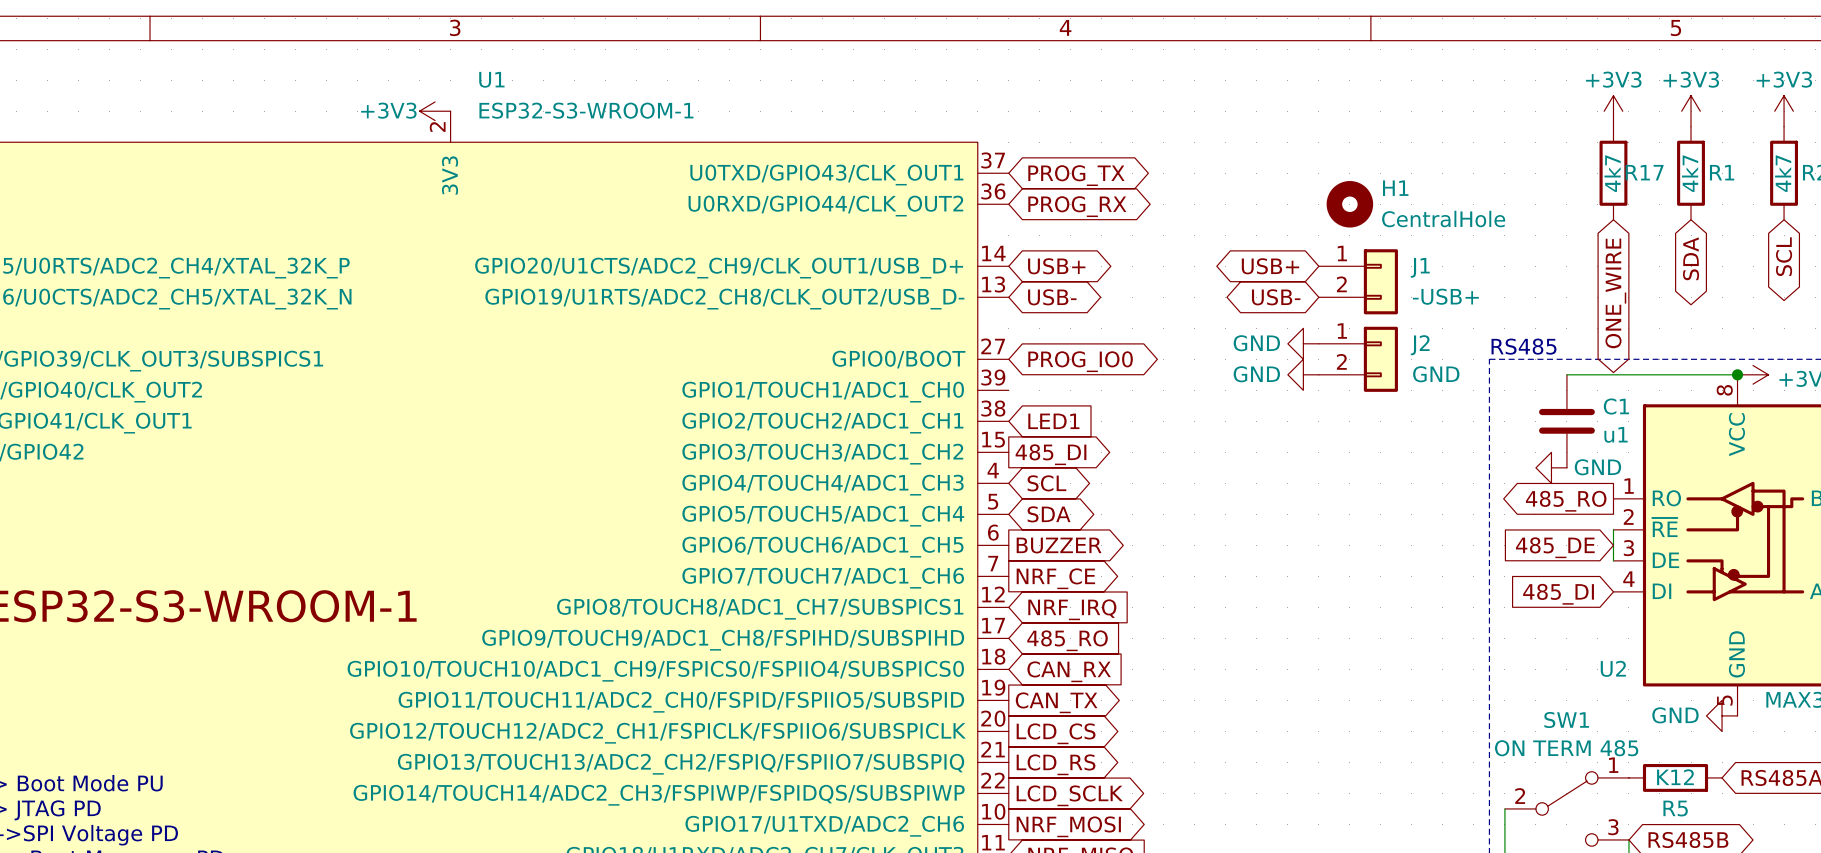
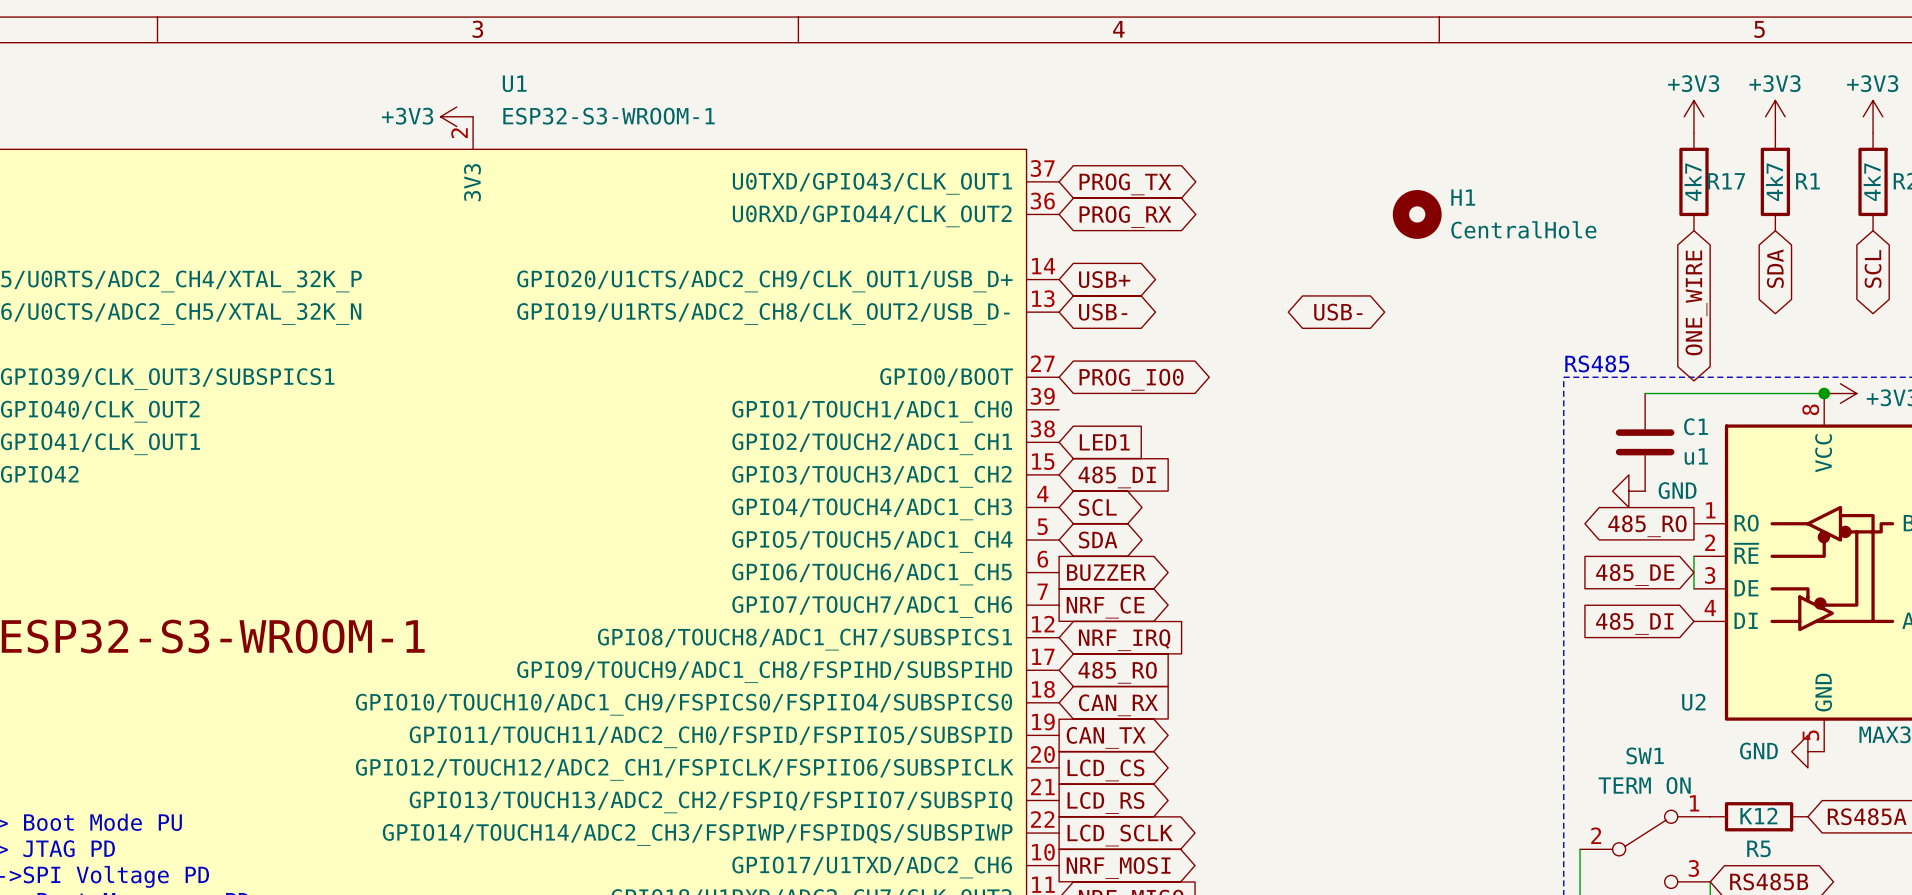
global label: USB+ (1270, 266) -> none
J1: -USB+ (1358, 281) -> none
power symbol: GND (1303, 343) -> none
J2: GND (1358, 359) -> none
power symbol: GND (1303, 374) -> none
global label shape: output (1051, 454) -> input (1117, 477)
SW1 value: ON TERM 485 (1566, 748) -> TERM ON (1644, 785)

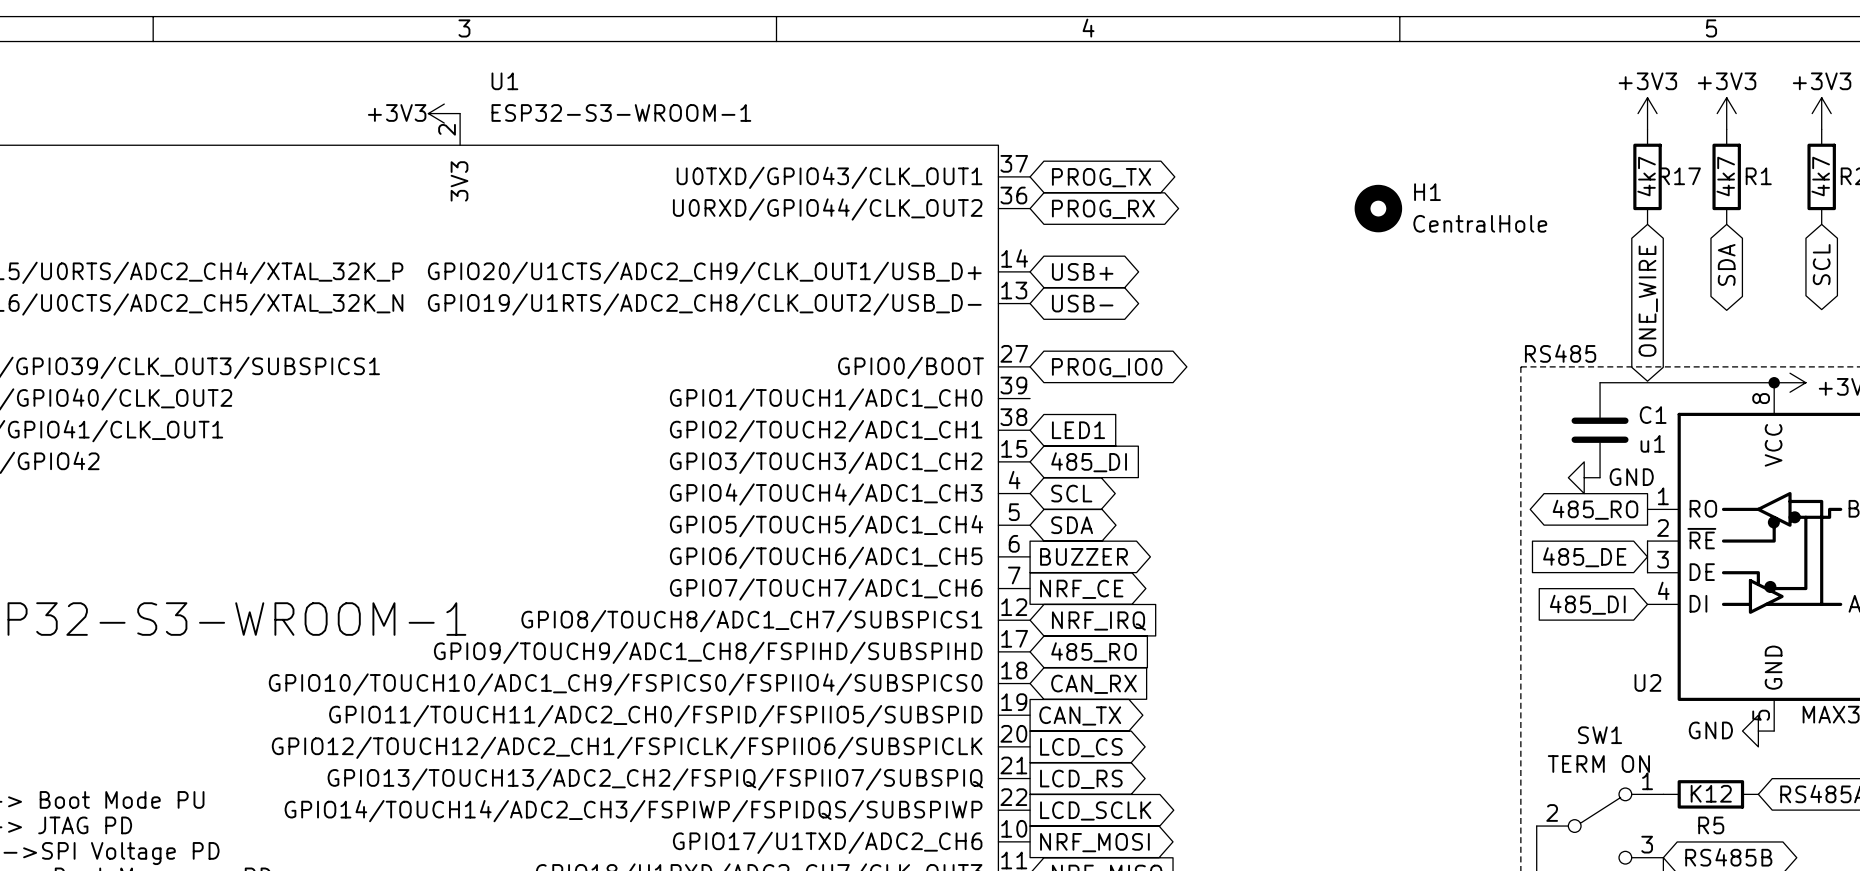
global label: USB- (1338, 312) -> none

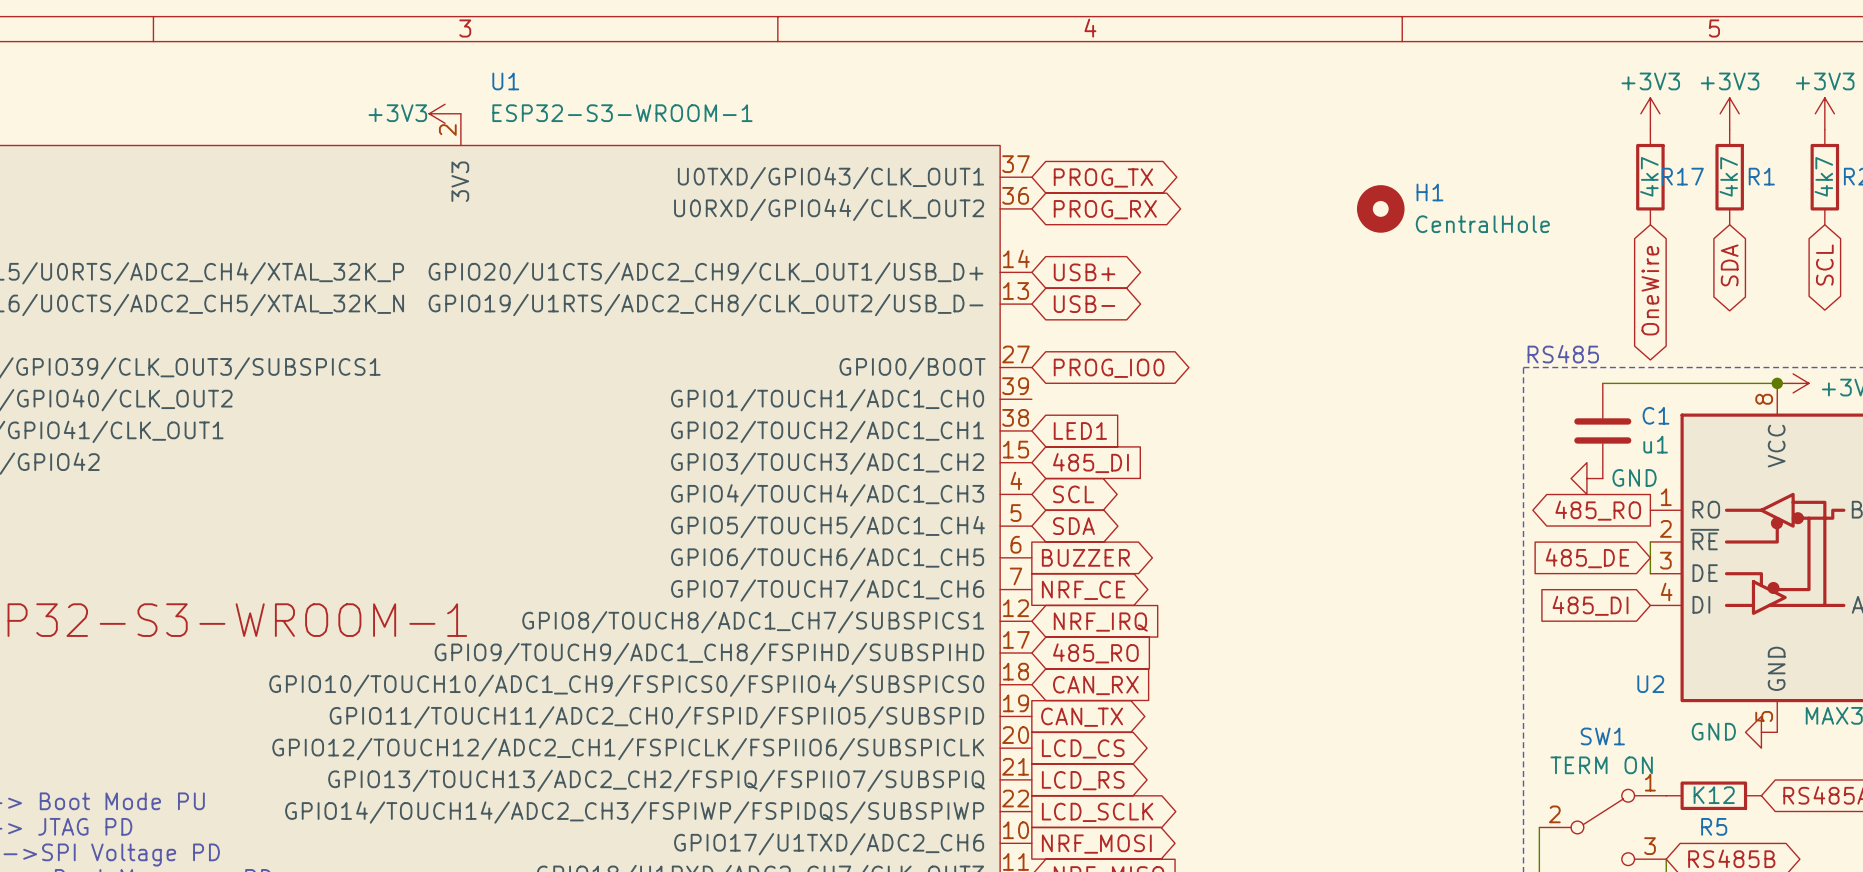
global label: ONE_WIRE (1648, 301) -> OneWire (1650, 290)

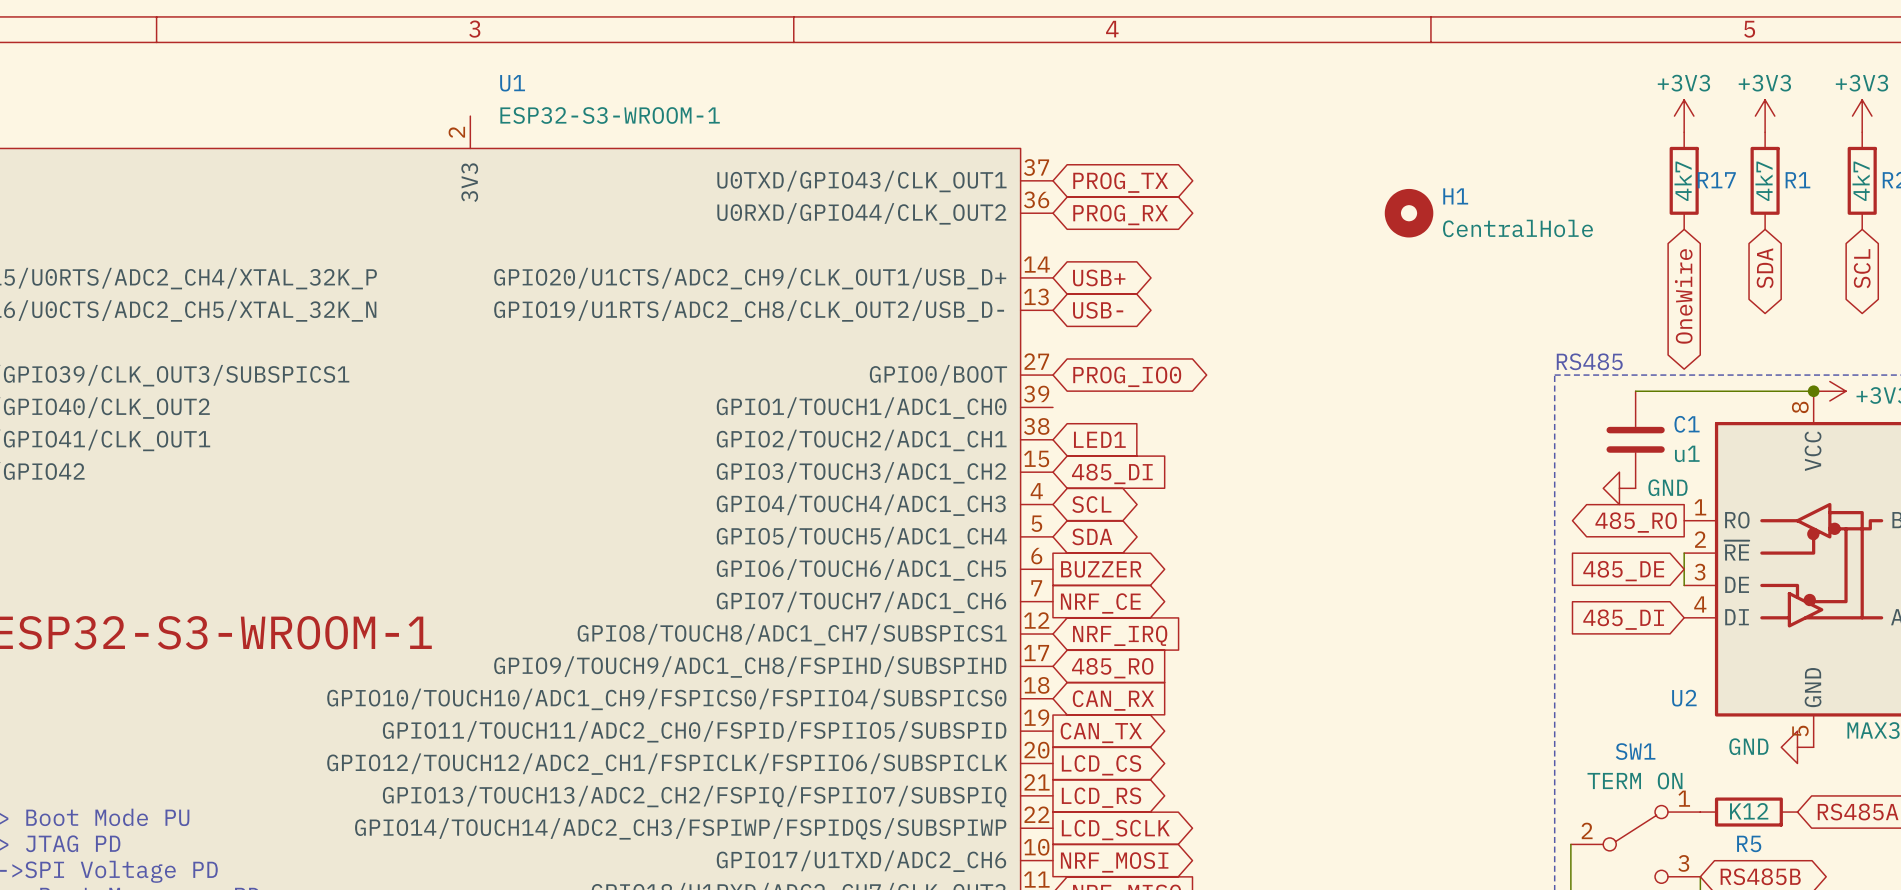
power symbol: +3V3 (445, 113) -> none

